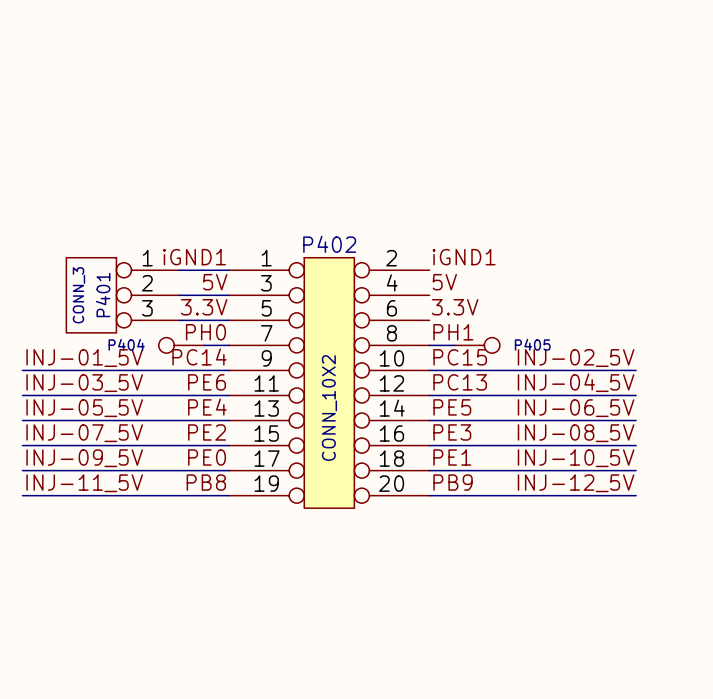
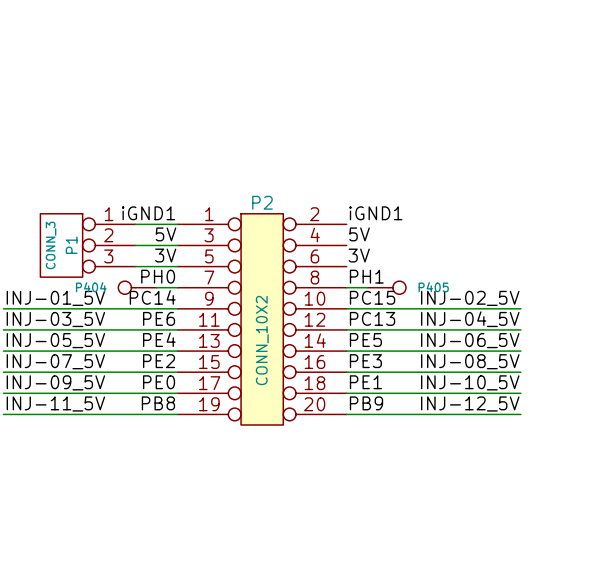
P402 name: P402 (329, 244) -> P2 (262, 202)
P401 name: P401 (103, 295) -> P1 (71, 245)
label: 3.3V (204, 307) -> 3V (165, 255)
label: 3.3V (455, 307) -> 3V (359, 255)

